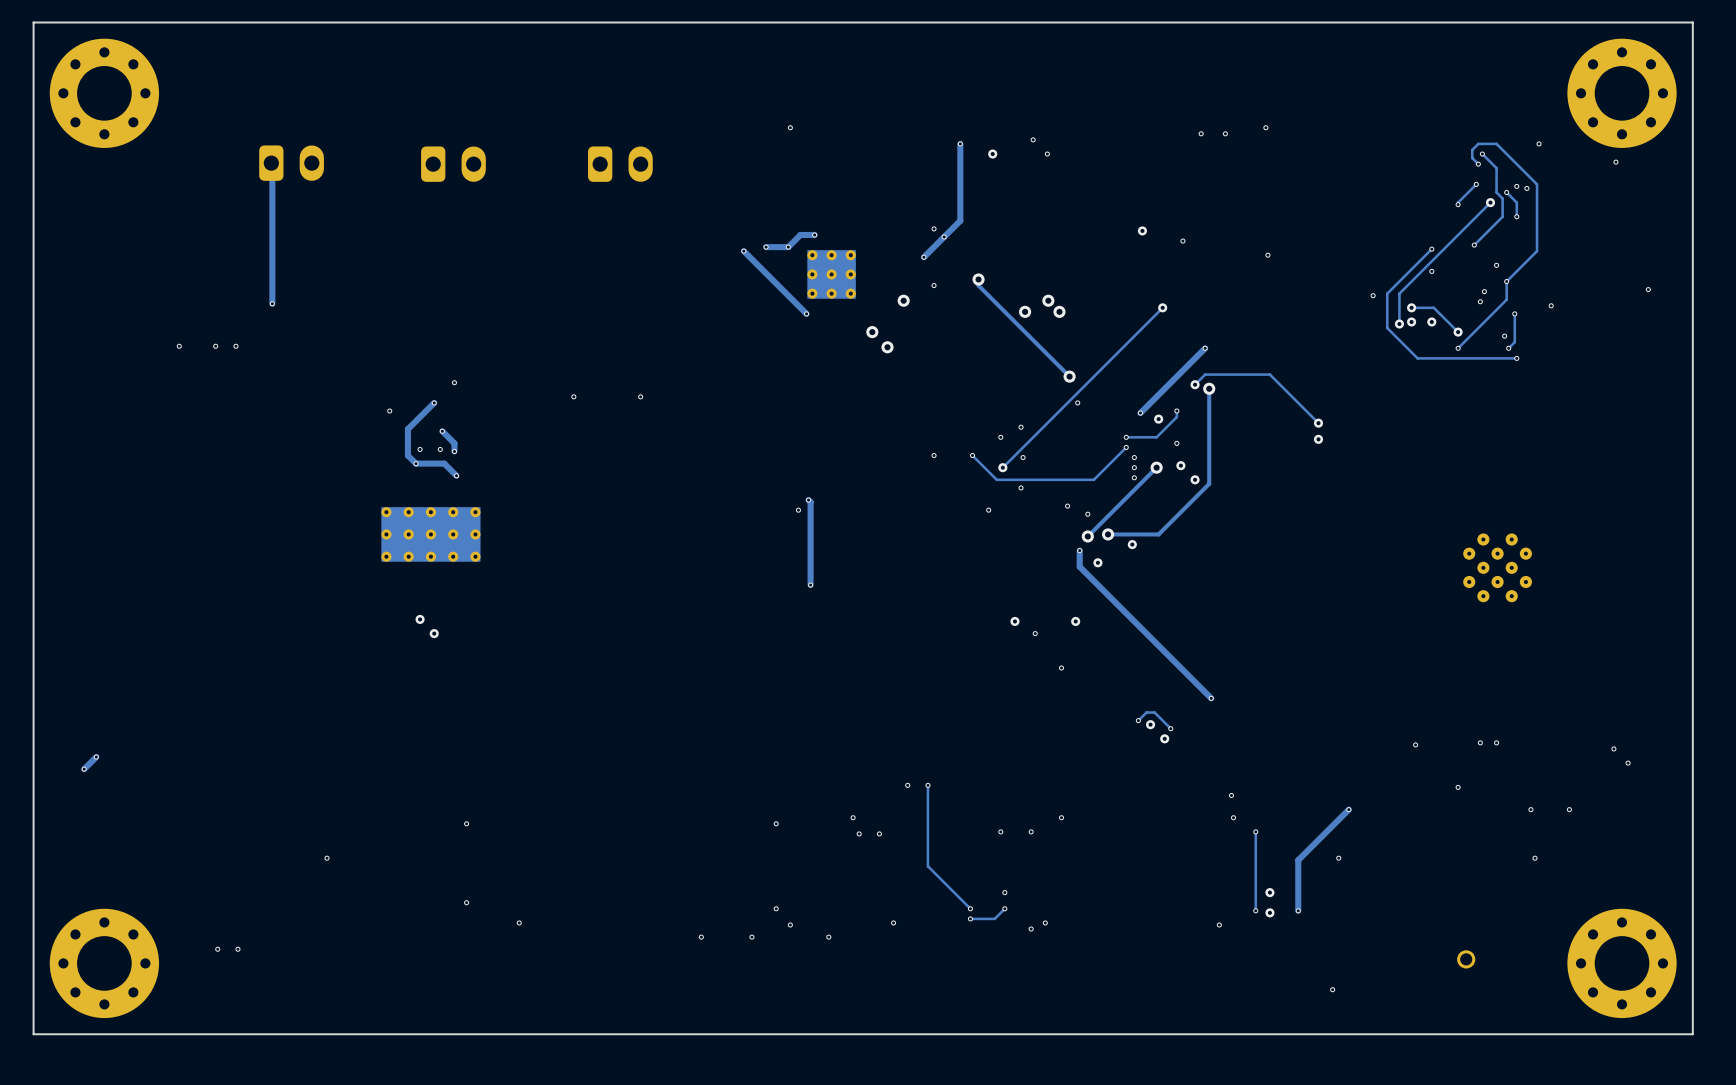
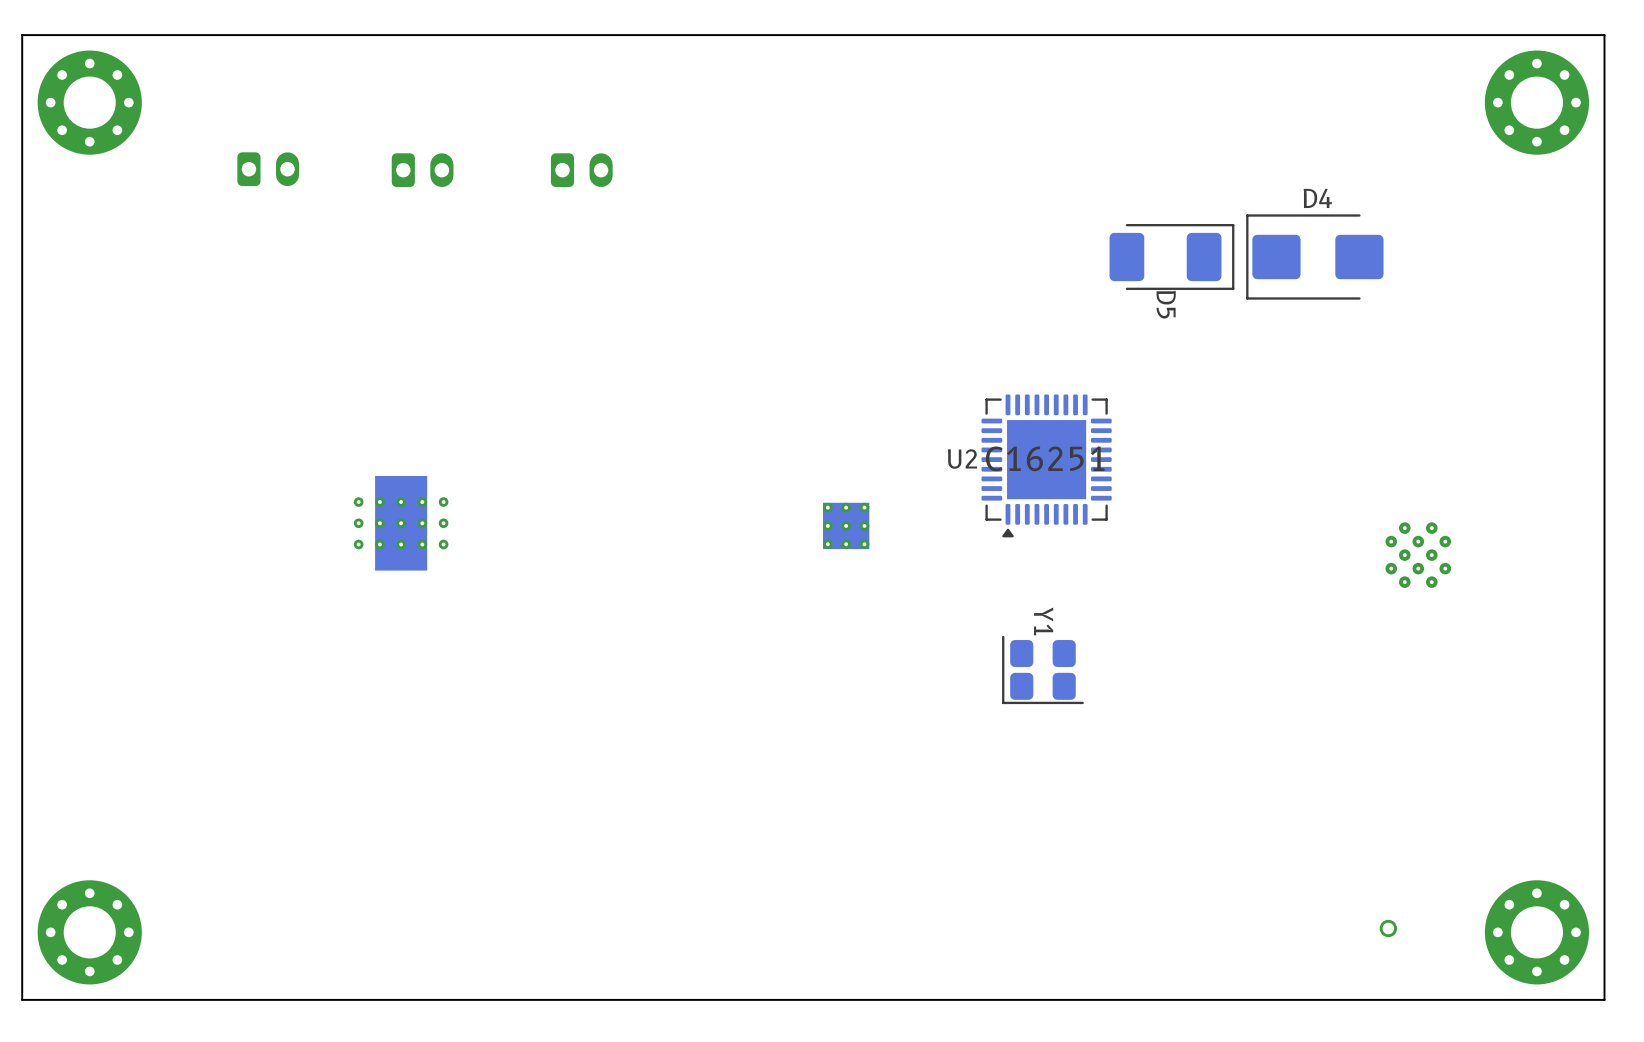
via: (790, 127) -> none
via: (1265, 127) -> none
via: (1201, 133) -> none
via: (1225, 133) -> none
via: (1033, 139) -> none
track: (960, 143) (960, 220) (923, 257) -> none
via: (960, 143) -> none
via: (1539, 143) -> none
via: (992, 154) -> none
via: (1047, 154) -> none
track: (1482, 154) (1496, 168) (1496, 192) (1502, 198) (1502, 216) (1474, 245) -> none
via: (1482, 154) -> none
via: (1615, 162) -> none
track: (272, 164) (272, 303) -> none
track: (1478, 164) (1472, 158) (1472, 149) (1478, 143) (1496, 143) (1537, 184) (1537, 251) (1506, 281) (1506, 299) (1458, 348) -> none
via: (1478, 164) -> none
track: (1476, 184) (1458, 204) -> none
via: (1476, 184) -> none
via: (1516, 186) -> none
via: (1526, 188) -> none
track: (1506, 192) (1516, 202) (1516, 216) -> none
via: (1506, 192) -> none
track: (1490, 202) (1399, 293) (1399, 324) -> none
via: (1490, 202) -> none
via: (1458, 204) -> none
via: (1516, 216) -> none
via: (934, 228) -> none
via: (1142, 230) -> none
track: (814, 234) (800, 234) (788, 247) (766, 247) -> none
via: (814, 234) -> none
via: (944, 237) -> none
via: (1182, 241) -> none
via: (1474, 245) -> none
via: (766, 247) -> none
via: (788, 247) -> none
track: (1431, 249) (1387, 293) (1387, 328) (1417, 358) (1516, 358) -> none
via: (1431, 249) -> none
track: (743, 251) (806, 313) -> none
via: (743, 251) -> none
D5: none -> (1171, 256)
via: (1267, 255) -> none
D4: none -> (1314, 256)
via: (923, 257) -> none
via: (1496, 265) -> none
via: (1431, 271) -> none
part position: (831, 274) -> (846, 525)
track: (978, 279) (978, 285) (1069, 376) -> none
via: (978, 279) -> none
via: (1506, 281) -> none
via: (934, 285) -> none
via: (1648, 289) -> none
via: (1484, 291) -> none
via: (1373, 295) -> none
via: (903, 300) -> none
via: (1048, 300) -> none
via: (1480, 301) -> none
via: (272, 303) -> none
via: (1551, 305) -> none
track: (1162, 307) (1002, 467) -> none
via: (1162, 307) -> none
track: (1411, 307) (1433, 307) (1458, 332) -> none
via: (1411, 307) -> none
via: (1025, 311) -> none
via: (1059, 311) -> none
via: (806, 313) -> none
track: (1514, 313) (1514, 342) (1508, 348) -> none
via: (1514, 313) -> none
via: (1411, 321) -> none
via: (1431, 321) -> none
via: (1399, 324) -> none
via: (872, 332) -> none
via: (1458, 332) -> none
via: (1504, 336) -> none
via: (179, 346) -> none
via: (215, 346) -> none
via: (235, 346) -> none
via: (887, 347) -> none
track: (1205, 348) (1140, 413) -> none
via: (1205, 348) -> none
via: (1458, 348) -> none
via: (1508, 348) -> none
via: (1516, 358) -> none
via: (1069, 376) -> none
via: (454, 382) -> none
track: (1195, 384) (1205, 374) (1269, 374) (1318, 423) -> none
via: (1195, 384) -> none
track: (1209, 388) (1209, 483) (1158, 534) (1108, 534) -> none
via: (1209, 388) -> none
via: (573, 396) -> none
via: (640, 396) -> none
track: (434, 402) (407, 429) (407, 455) (416, 463) (444, 463) (456, 475) -> none
via: (434, 402) -> none
via: (1077, 402) -> none
via: (389, 411) -> none
track: (1176, 411) (1176, 417) (1156, 437) (1126, 437) -> none
via: (1176, 411) -> none
via: (1140, 413) -> none
via: (1158, 419) -> none
via: (1318, 423) -> none
via: (1021, 427) -> none
track: (442, 431) (454, 443) (454, 451) -> none
via: (442, 431) -> none
via: (1000, 437) -> none
via: (1126, 437) -> none
via: (1318, 439) -> none
via: (1176, 443) -> none
track: (1126, 447) (1093, 479) (996, 479) (972, 455) -> none
via: (1126, 447) -> none
via: (420, 449) -> none
via: (440, 449) -> none
via: (454, 451) -> none
via: (934, 455) -> none
via: (972, 455) -> none
via: (1023, 457) -> none
via: (1134, 457) -> none
via: (416, 463) -> none
via: (1180, 465) -> none
via: (1002, 467) -> none
via: (1134, 467) -> none
track: (1156, 467) (1087, 536) -> none
via: (1156, 467) -> none
U2: none -> (1046, 465)
via: (456, 475) -> none
via: (1134, 477) -> none
via: (1195, 479) -> none
via: (1021, 487) -> none
track: (808, 500) (810, 502) (810, 585) -> none
via: (808, 500) -> none
via: (1067, 506) -> none
part footprint: [381, 507, 481, 562] -> [353, 476, 449, 571]
via: (798, 510) -> none
via: (988, 510) -> none
via: (1087, 514) -> none
via: (1108, 534) -> none
via: (1087, 536) -> none
via: (1132, 544) -> none
track: (1079, 550) (1079, 566) (1211, 698) -> none
via: (1079, 550) -> none
via: (1097, 562) -> none
via: (810, 585) -> none
via: (420, 619) -> none
via: (1014, 621) -> none
via: (1075, 621) -> none
via: (434, 633) -> none
via: (1035, 633) -> none
via: (1061, 668) -> none
Y1: none -> (1042, 669)
via: (1211, 698) -> none
track: (1138, 720) (1146, 712) (1154, 712) (1170, 728) -> none
via: (1138, 720) -> none
via: (1150, 724) -> none
via: (1170, 728) -> none
via: (1164, 738) -> none
via: (1480, 742) -> none
via: (1496, 742) -> none
via: (1415, 744) -> none
via: (1613, 748) -> none
track: (96, 757) (84, 769) -> none
via: (96, 757) -> none
via: (1628, 763) -> none
via: (84, 769) -> none
via: (907, 785) -> none
track: (927, 785) (927, 866) (970, 908) -> none
via: (927, 785) -> none
via: (1458, 787) -> none
via: (1231, 795) -> none
track: (1348, 809) (1298, 860) (1298, 910) -> none
via: (1348, 809) -> none
via: (1530, 809) -> none
via: (1569, 809) -> none
via: (853, 817) -> none
via: (1061, 817) -> none
via: (1233, 817) -> none
via: (466, 823) -> none
via: (776, 823) -> none
via: (1000, 831) -> none
via: (1031, 831) -> none
track: (1255, 831) (1255, 910) -> none
via: (1255, 831) -> none
via: (859, 833) -> none
via: (879, 833) -> none
via: (326, 858) -> none
via: (1338, 858) -> none
via: (1535, 858) -> none
via: (1004, 892) -> none
via: (1269, 892) -> none
via: (466, 902) -> none
via: (776, 908) -> none
via: (970, 908) -> none
track: (1004, 908) (994, 918) (970, 918) -> none
via: (1004, 908) -> none
via: (1255, 910) -> none
via: (1298, 910) -> none
via: (1269, 912) -> none
via: (970, 918) -> none
via: (519, 922) -> none
via: (893, 922) -> none
via: (1045, 922) -> none
via: (790, 924) -> none
via: (1219, 924) -> none
via: (1031, 929) -> none
via: (701, 937) -> none
via: (751, 937) -> none
via: (828, 937) -> none
via: (217, 949) -> none
via: (237, 949) -> none
via: (1332, 989) -> none

